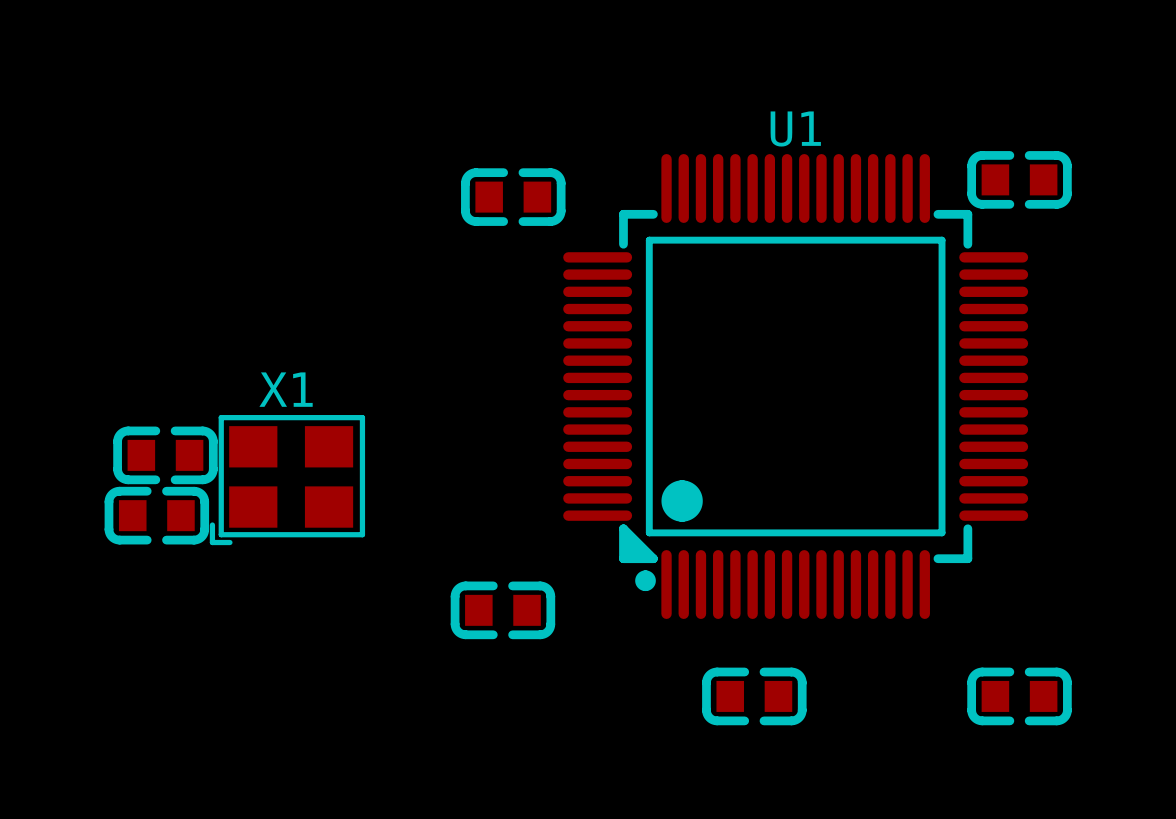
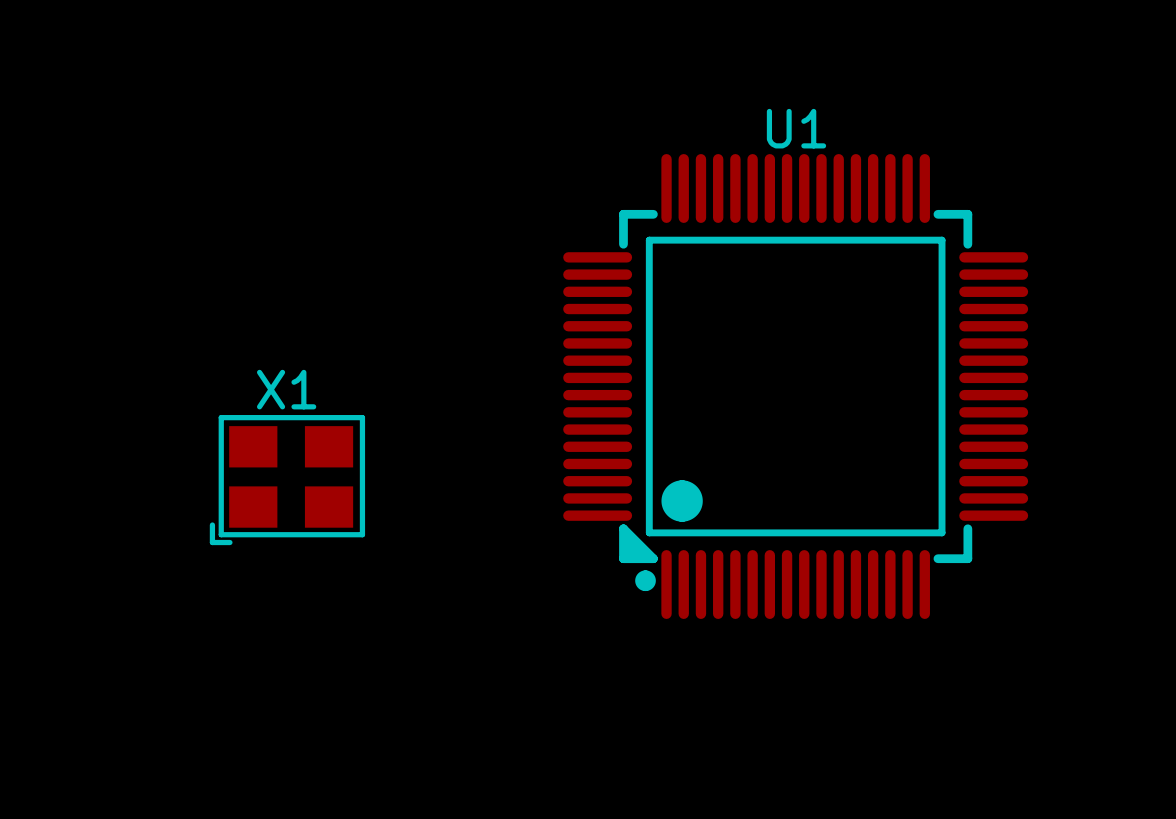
part: (1019, 179) -> none
part: (513, 197) -> none
part: (165, 455) -> none
part: (156, 515) -> none
part: (502, 610) -> none
part: (754, 696) -> none
part: (1019, 696) -> none

